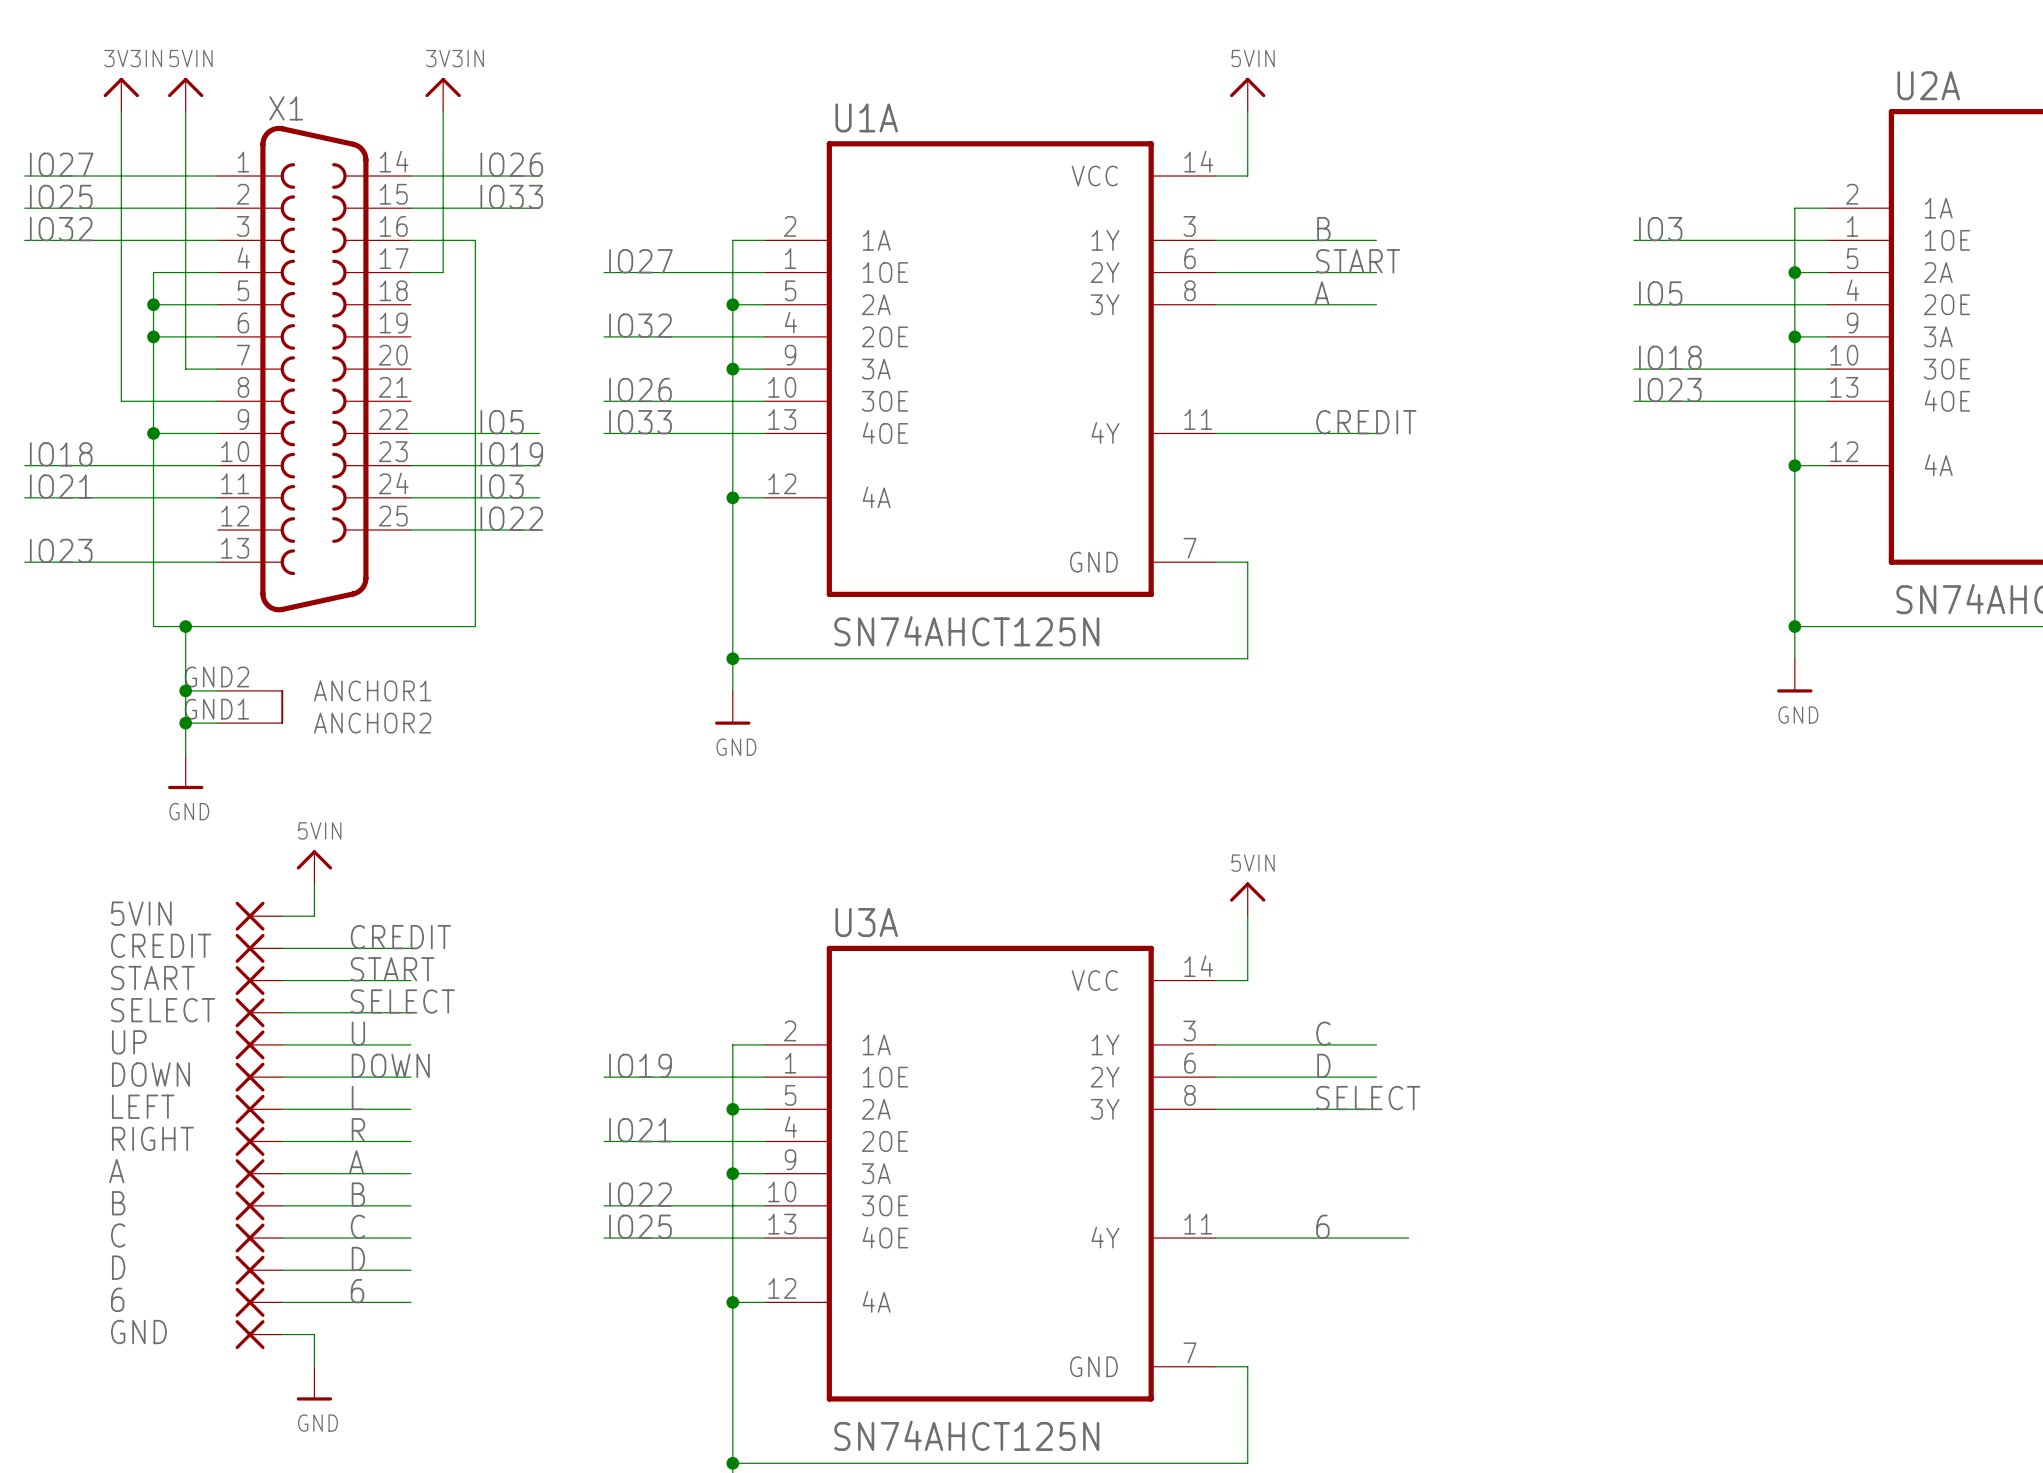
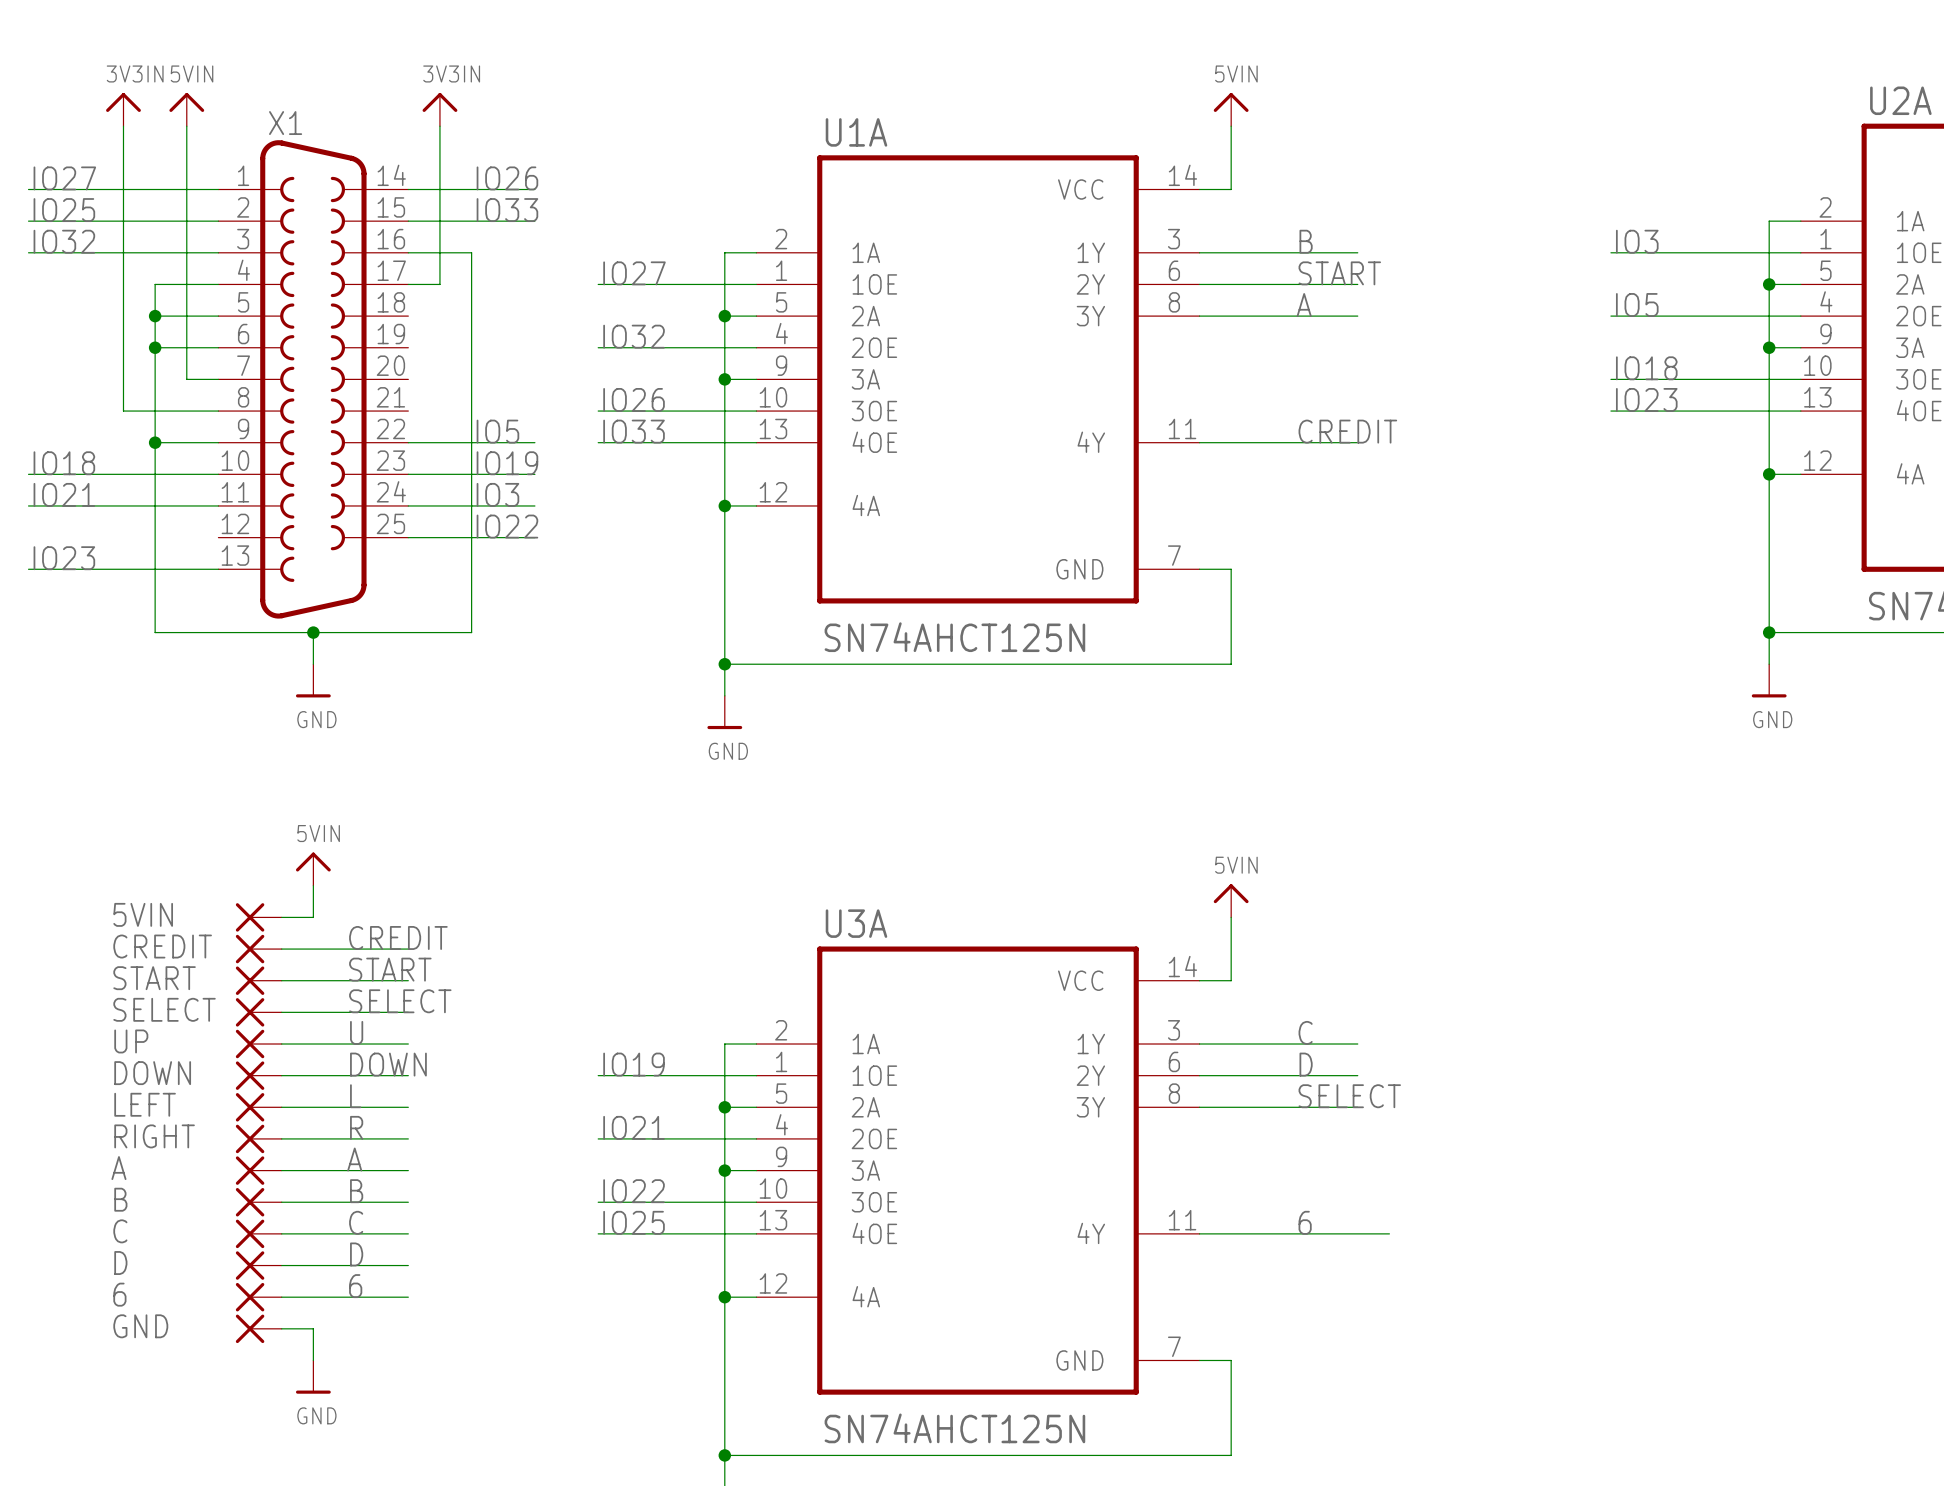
X1 symbol: [217, 125, 411, 725] -> [218, 140, 409, 619]
wire: (185, 626) (185, 755) -> none
junction: (185, 626) -> none
wire: none -> (313, 632) (313, 664)
junction: none -> (313, 632)
wire: (185, 690) (217, 690) -> none
junction: (185, 690) -> none
wire: (185, 723) (217, 723) -> none
junction: (185, 723) -> none
power symbol position: GND (185, 772) -> GND (313, 680)

